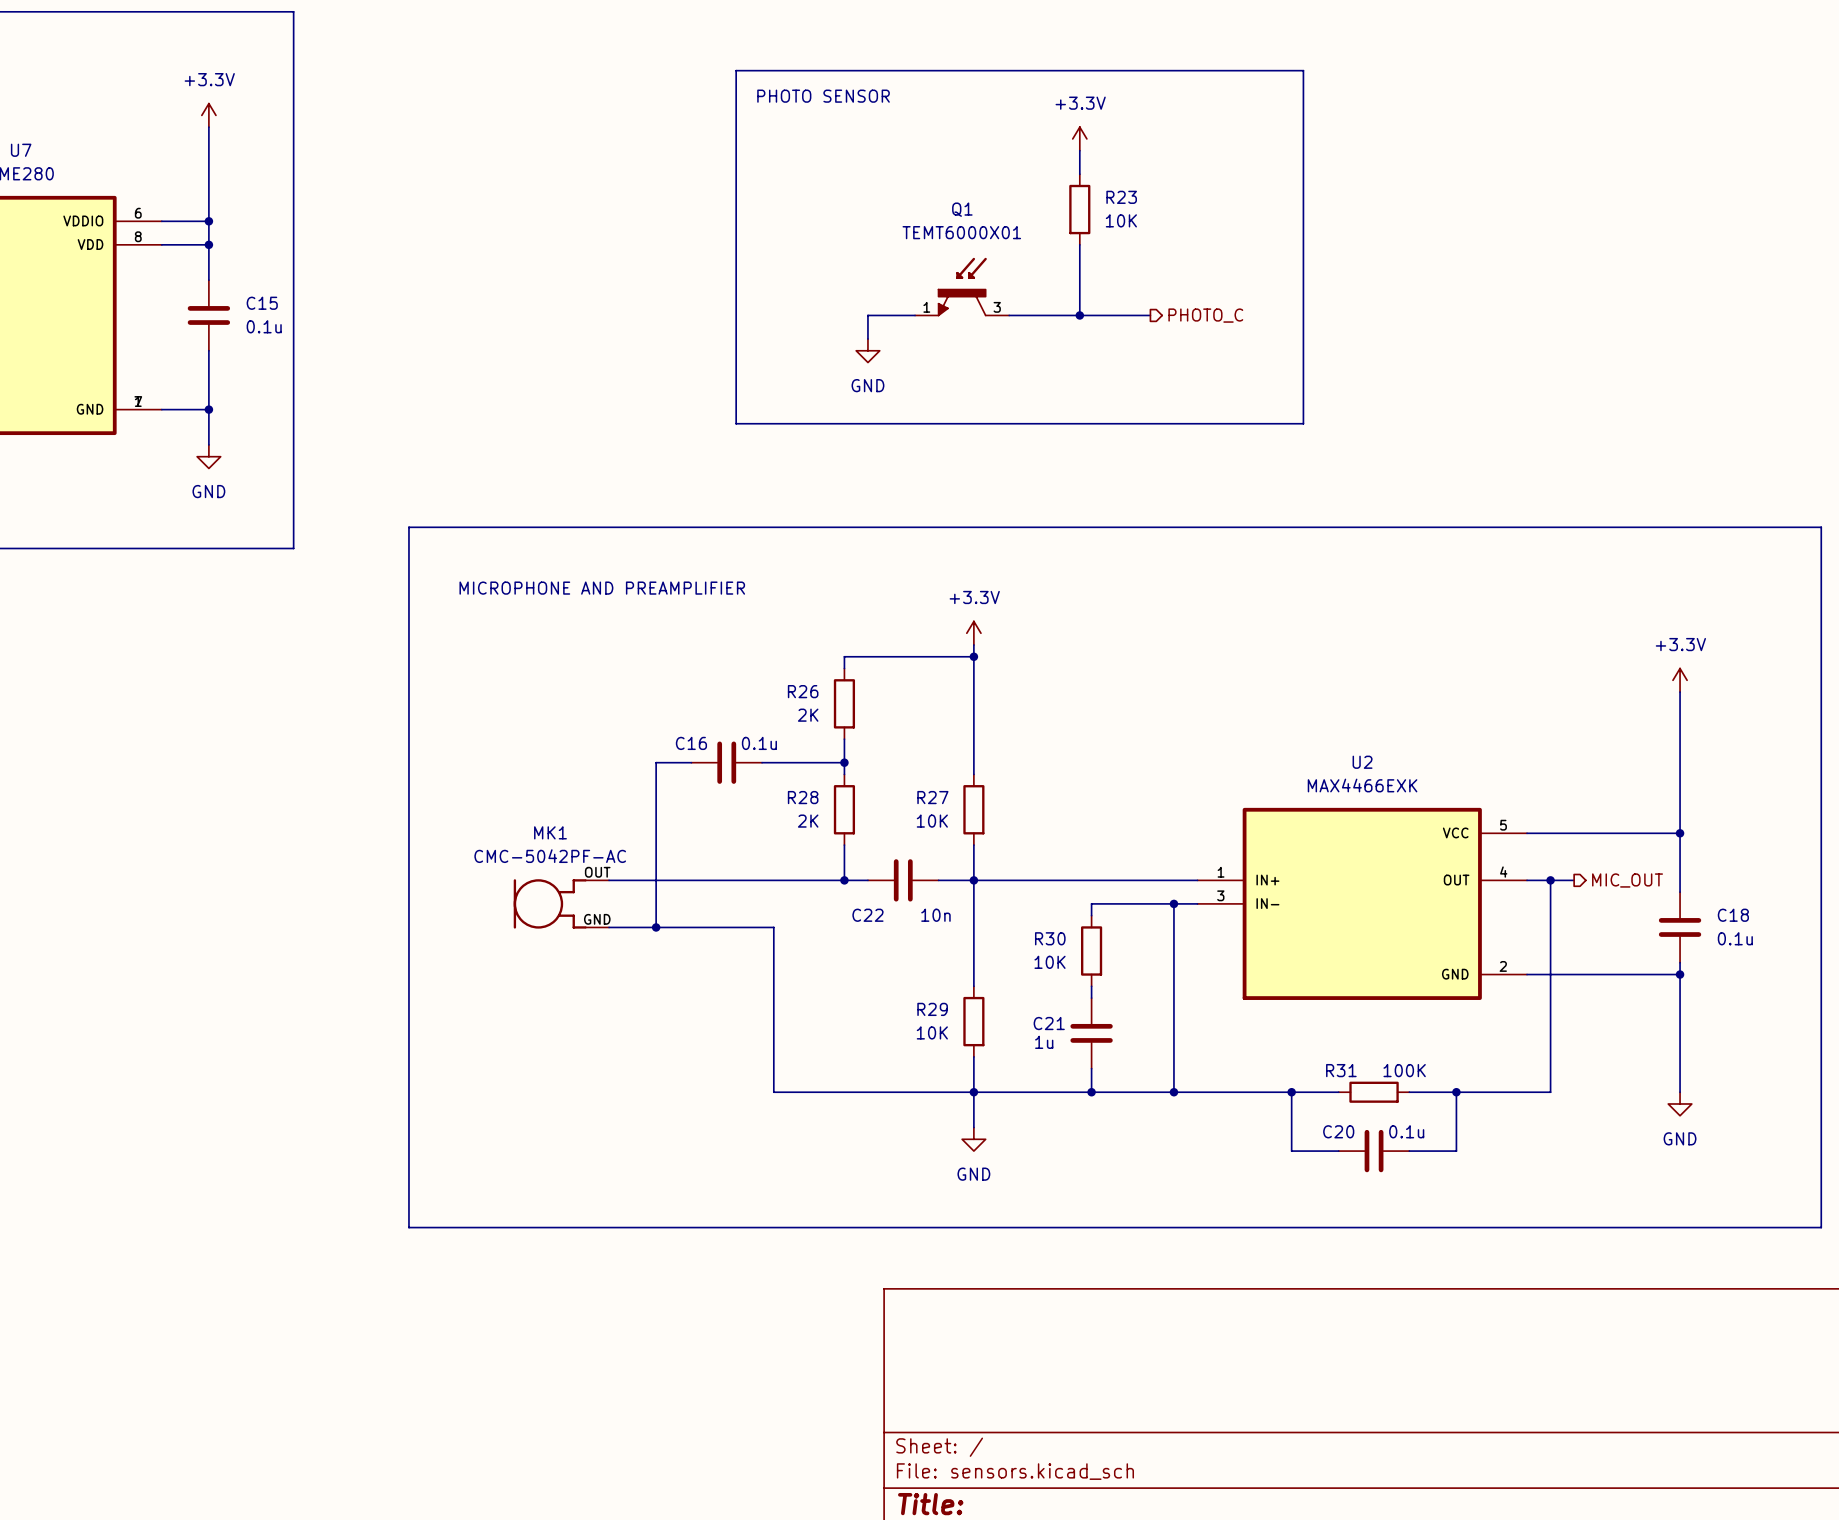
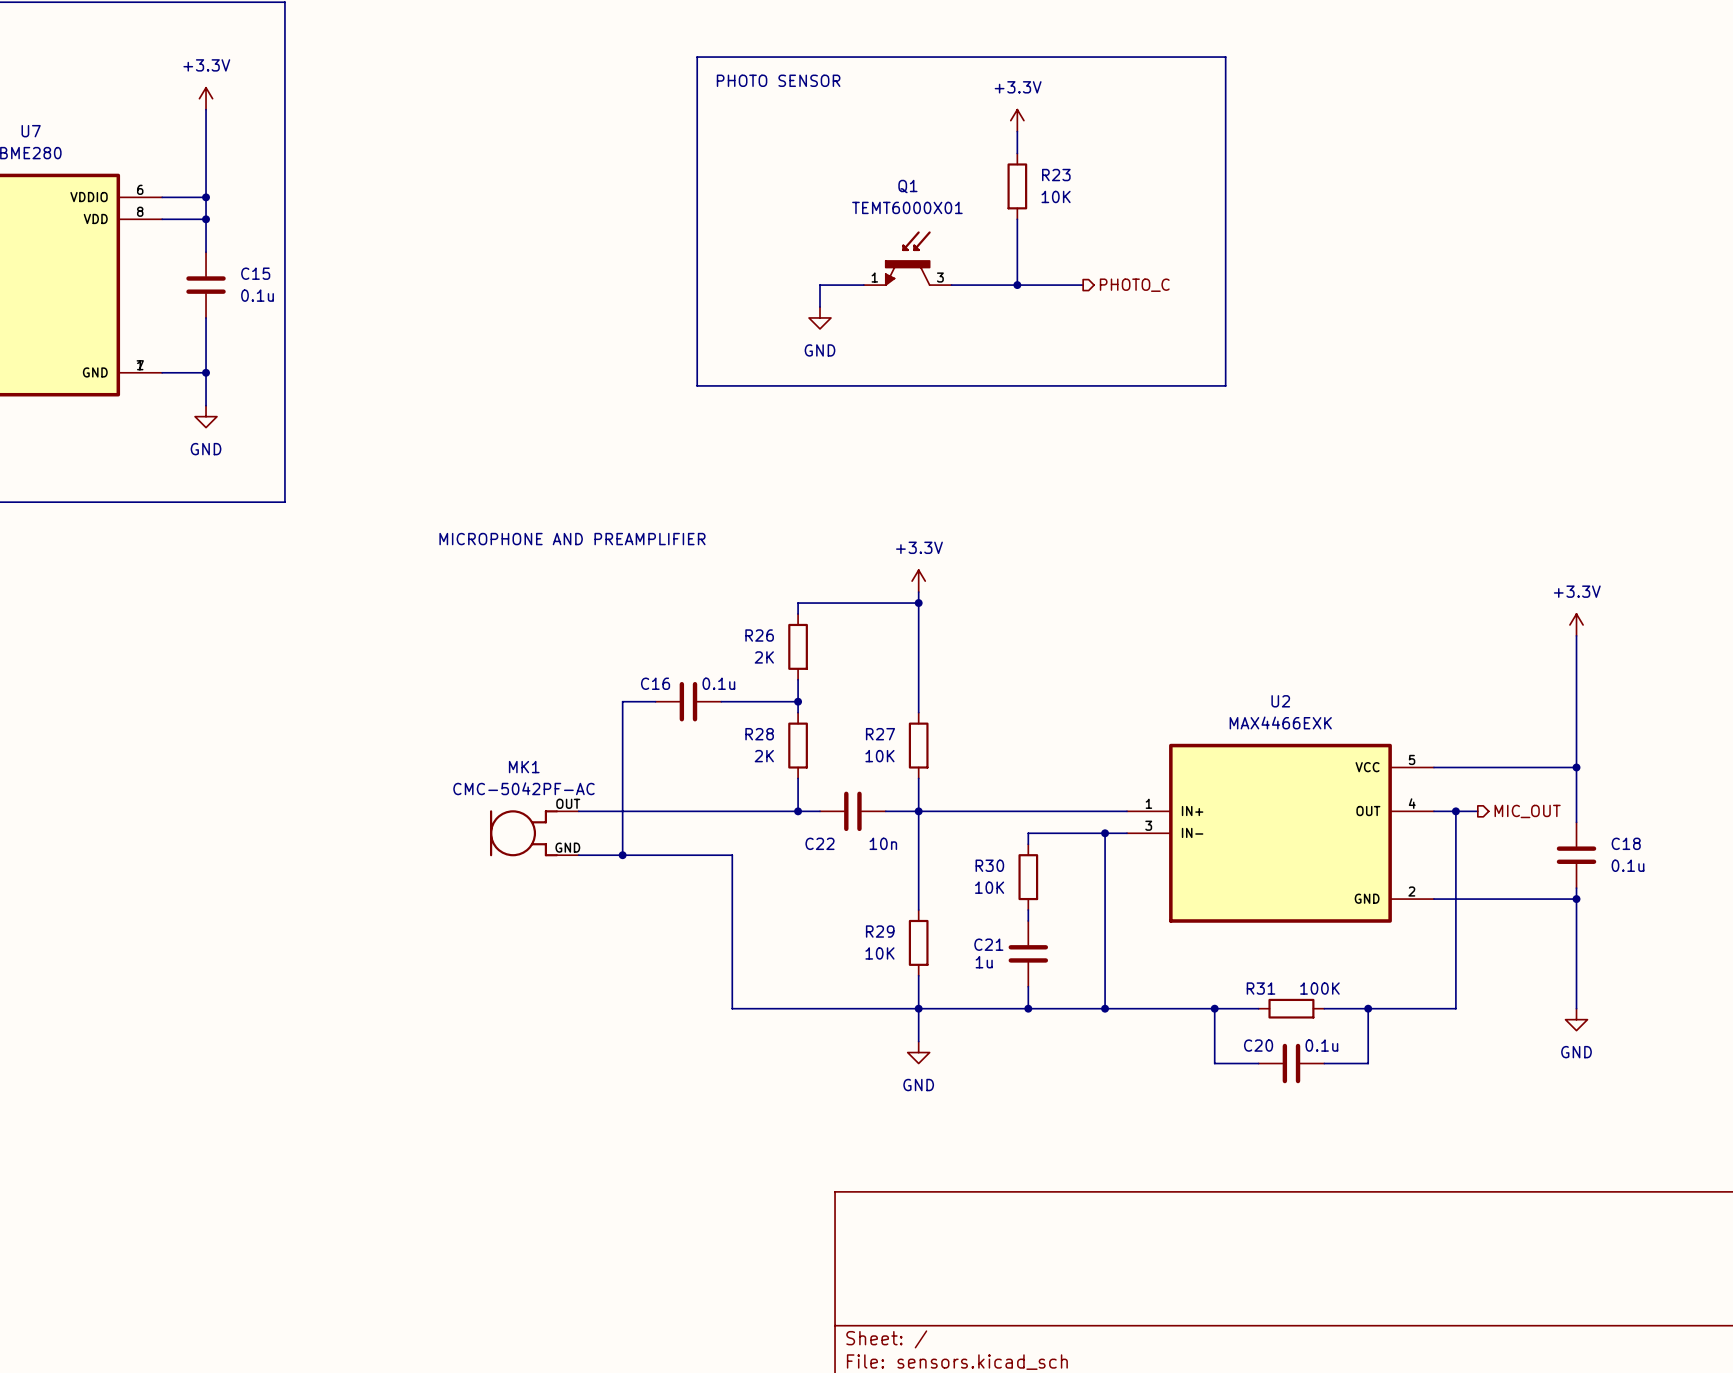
line: (408, 527) (1821, 527) (1821, 1227) (408, 1227) (408, 527) -> none

